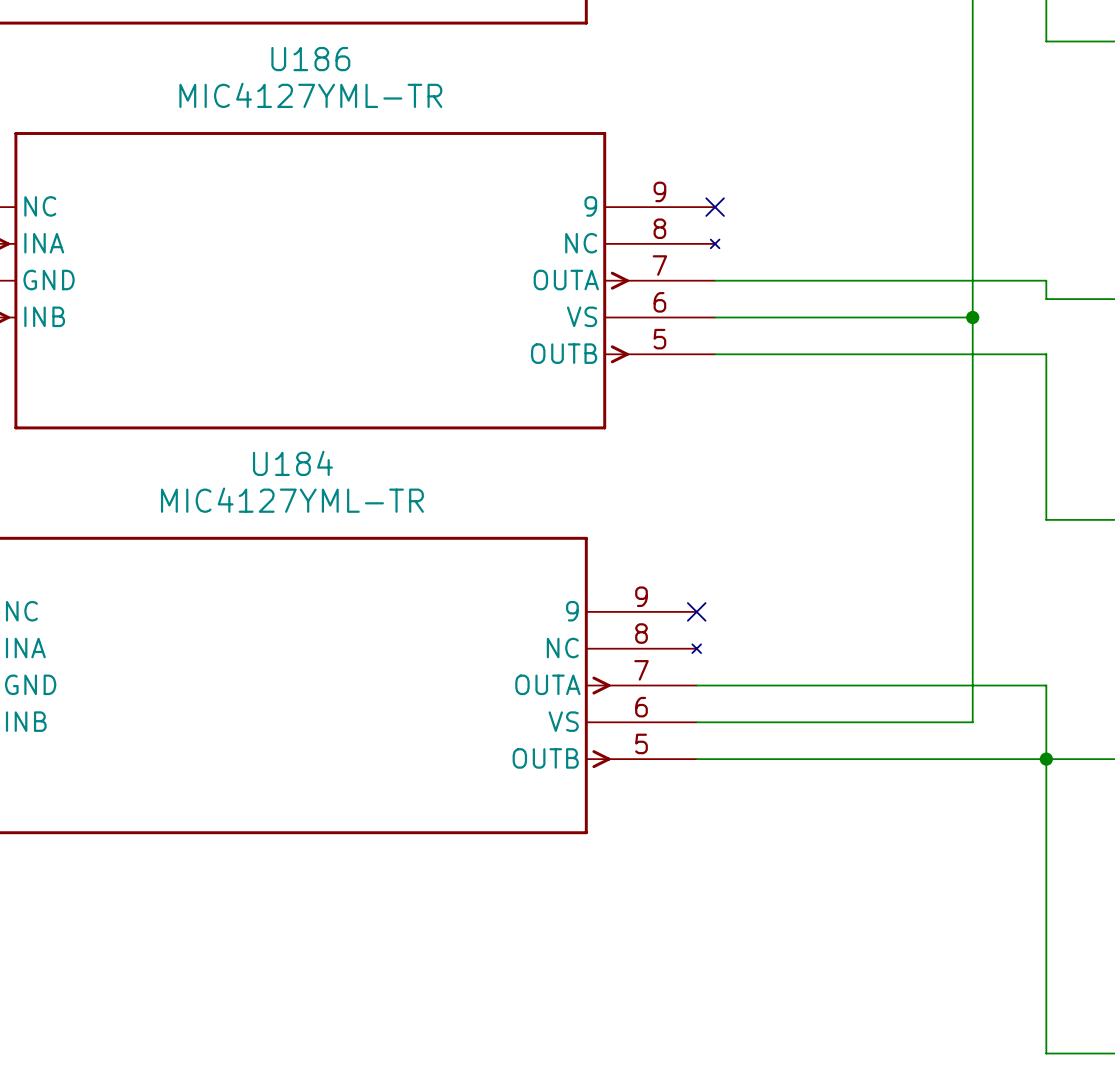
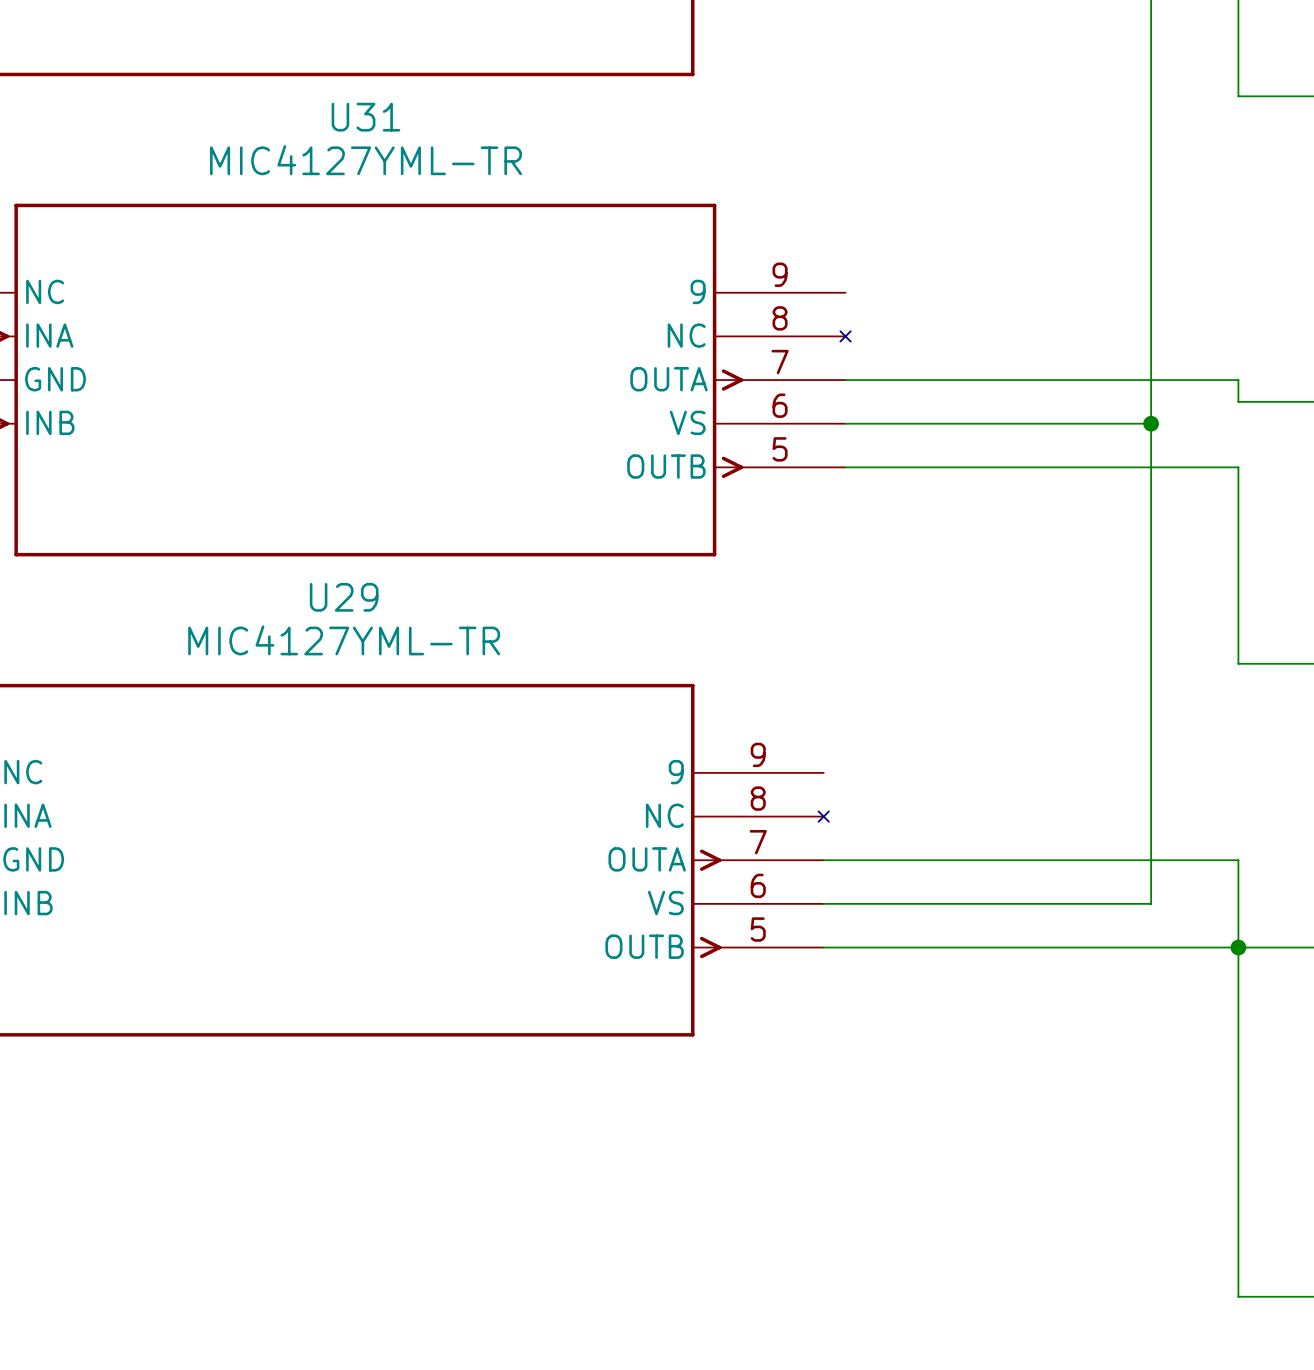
U186 name: U186 (310, 59) -> U31 (365, 117)
no-connect mark: (715, 207) -> none
U184 name: U184 (292, 463) -> U29 (344, 597)
no-connect mark: (696, 611) -> none

